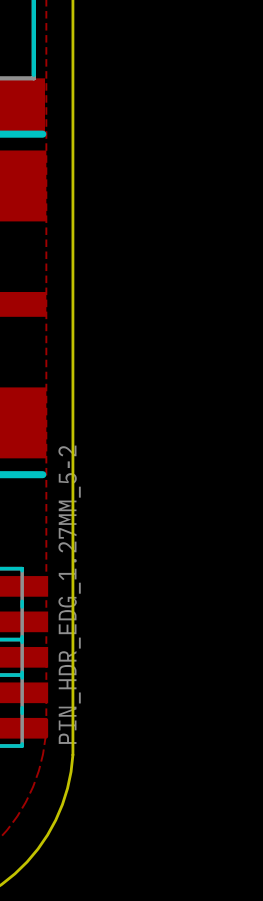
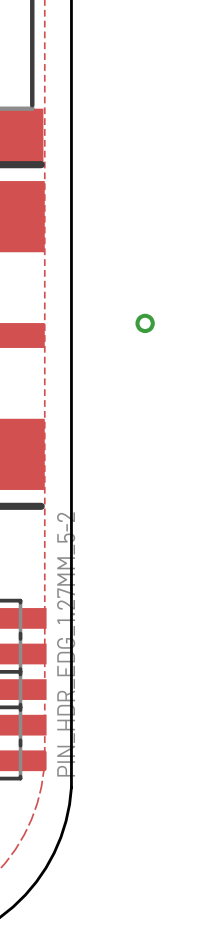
via: none -> (145, 323)

